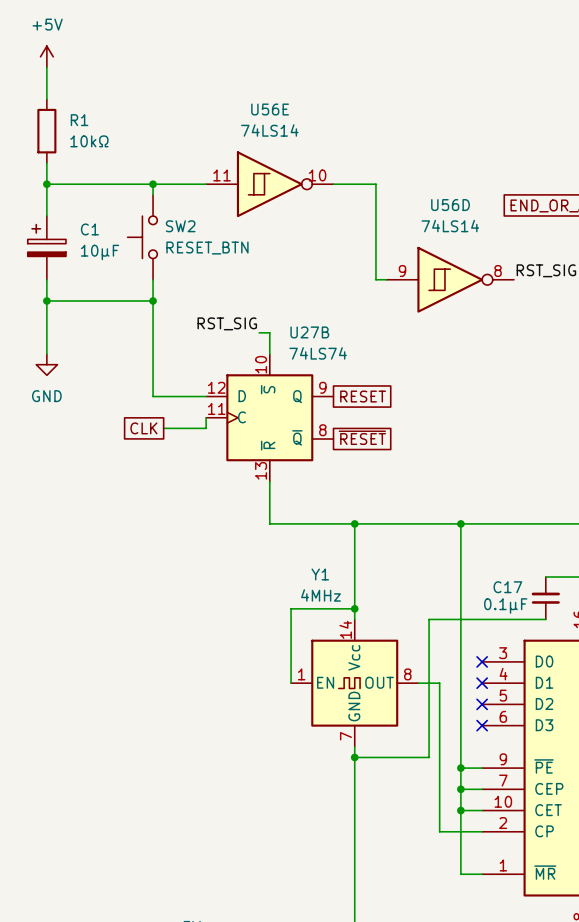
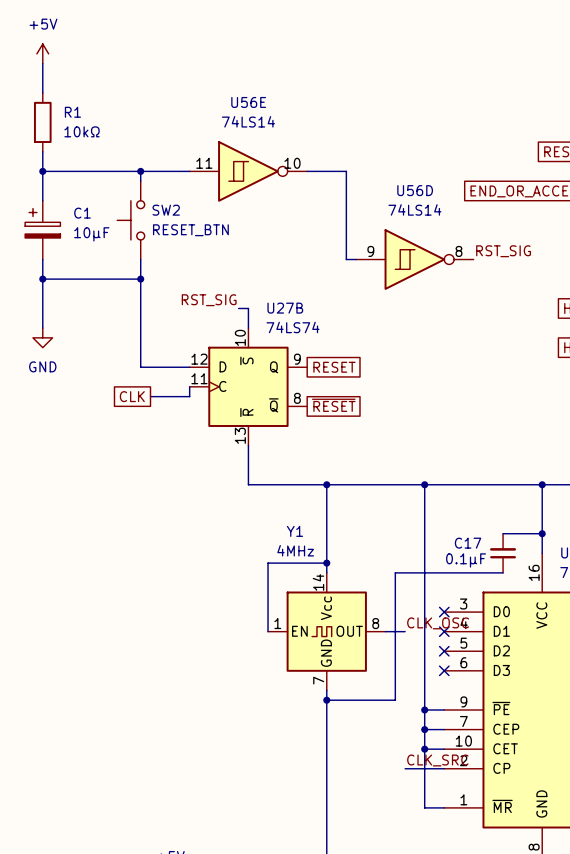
label: none -> CLK_OSC (438, 623)
wire: (439, 683) (439, 831) -> none
label: none -> CLK_SRC (437, 760)

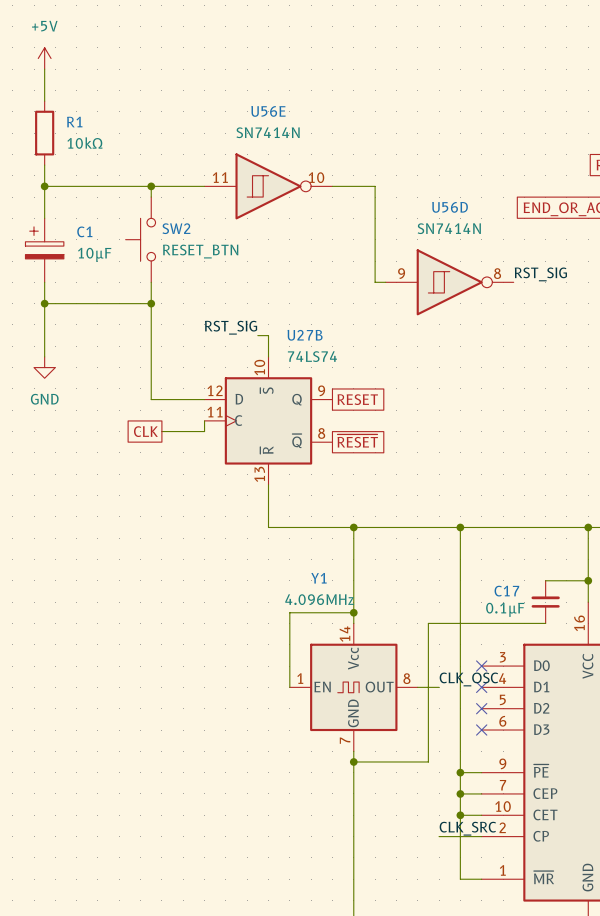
U56E value: 74LS14 (248, 121) -> SN7414N (268, 132)
U56D value: 74LS14 (414, 209) -> SN7414N (449, 228)
Y1 value: 4MHz (295, 550) -> 4.096MHz (319, 599)

